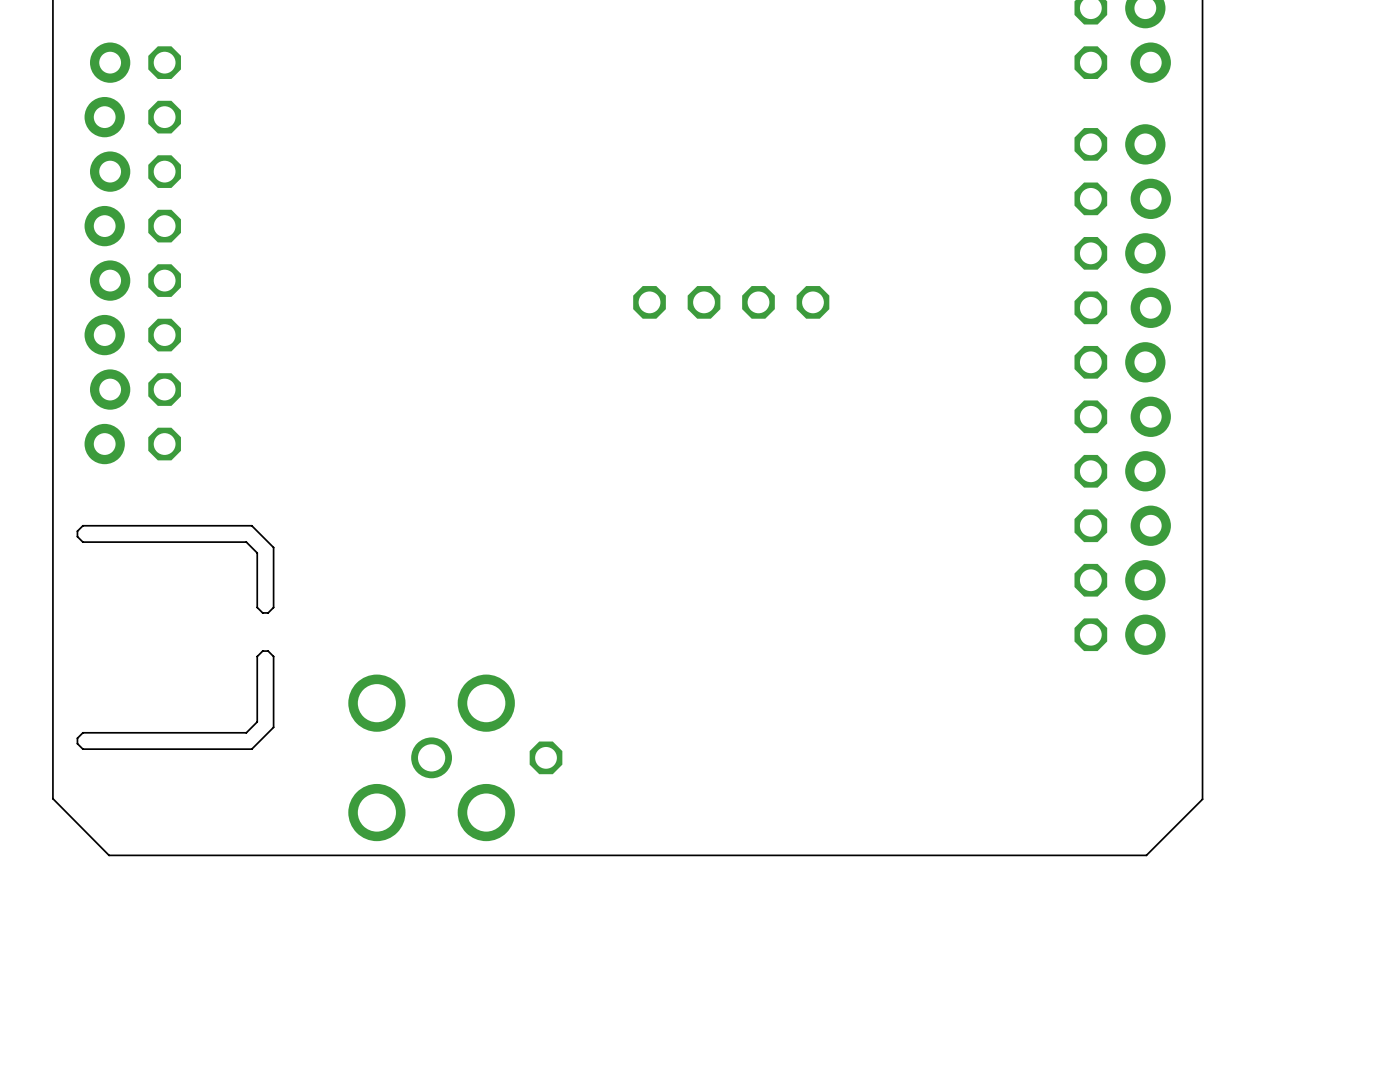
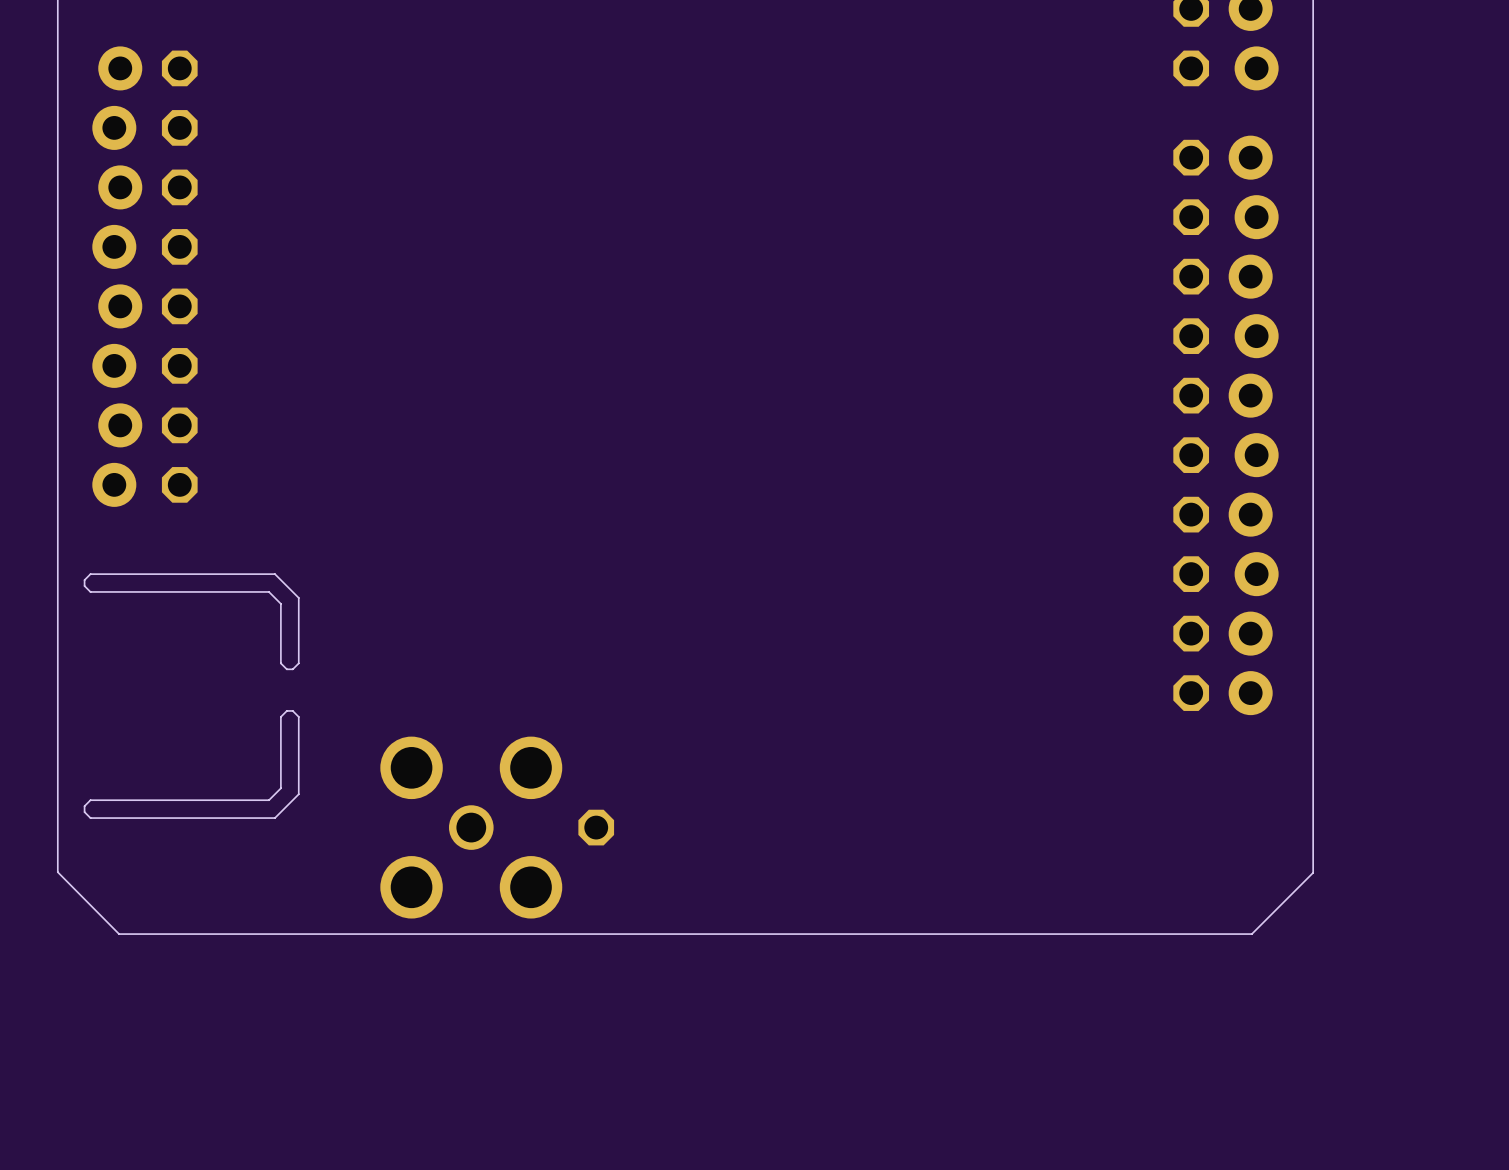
part: (731, 302) -> none

